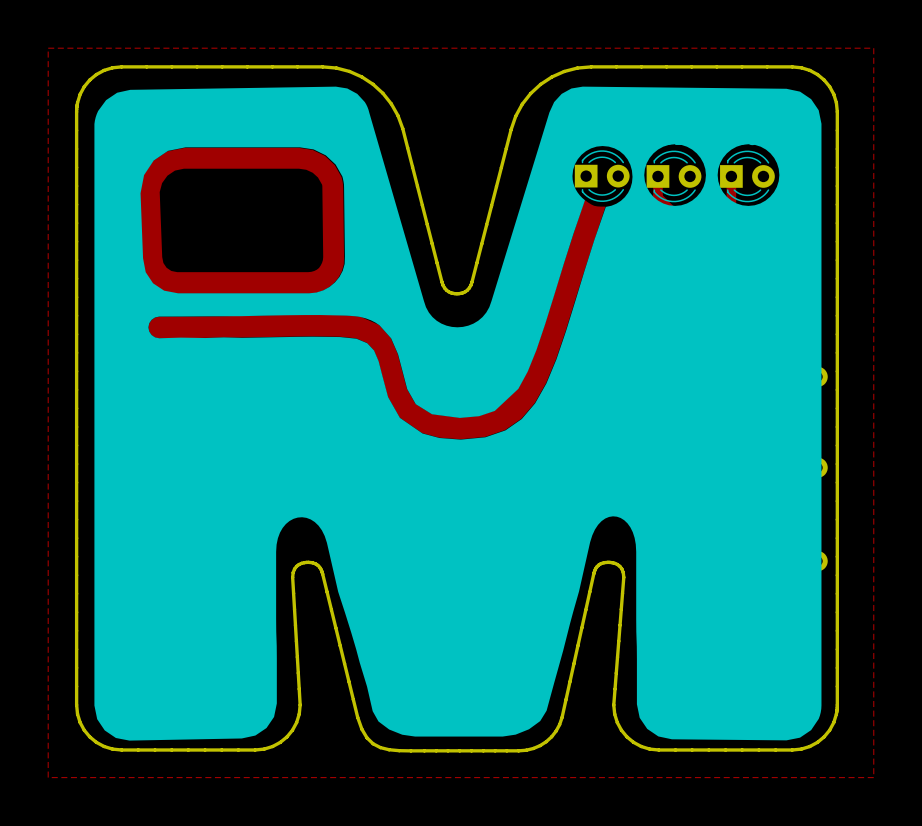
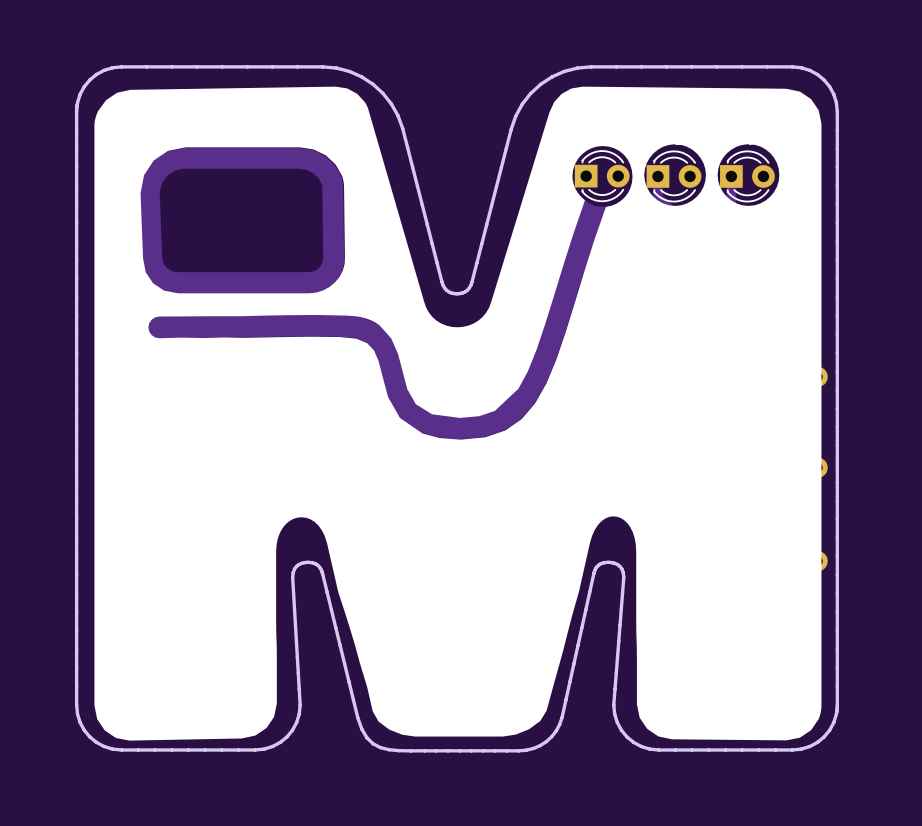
zone outline: (48, 48) (873, 48) (873, 777) (48, 777) (48, 48) -> none

